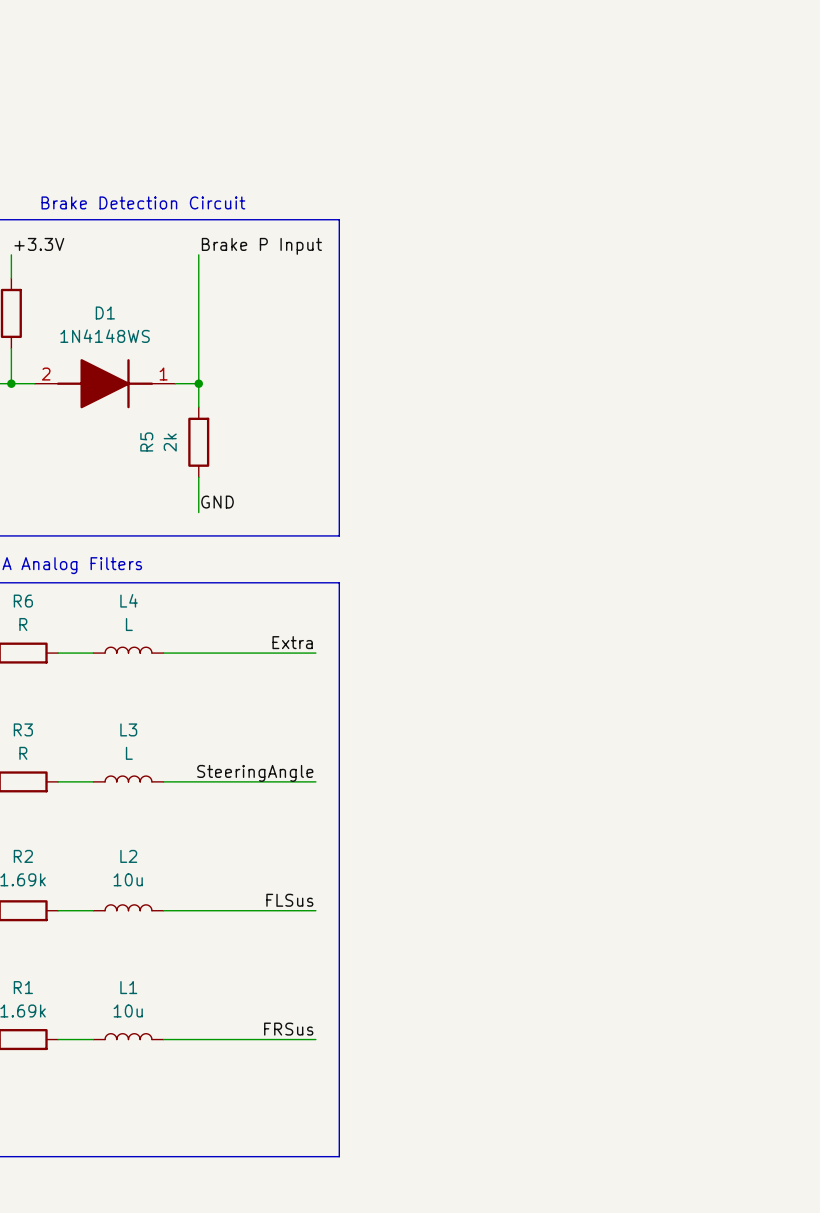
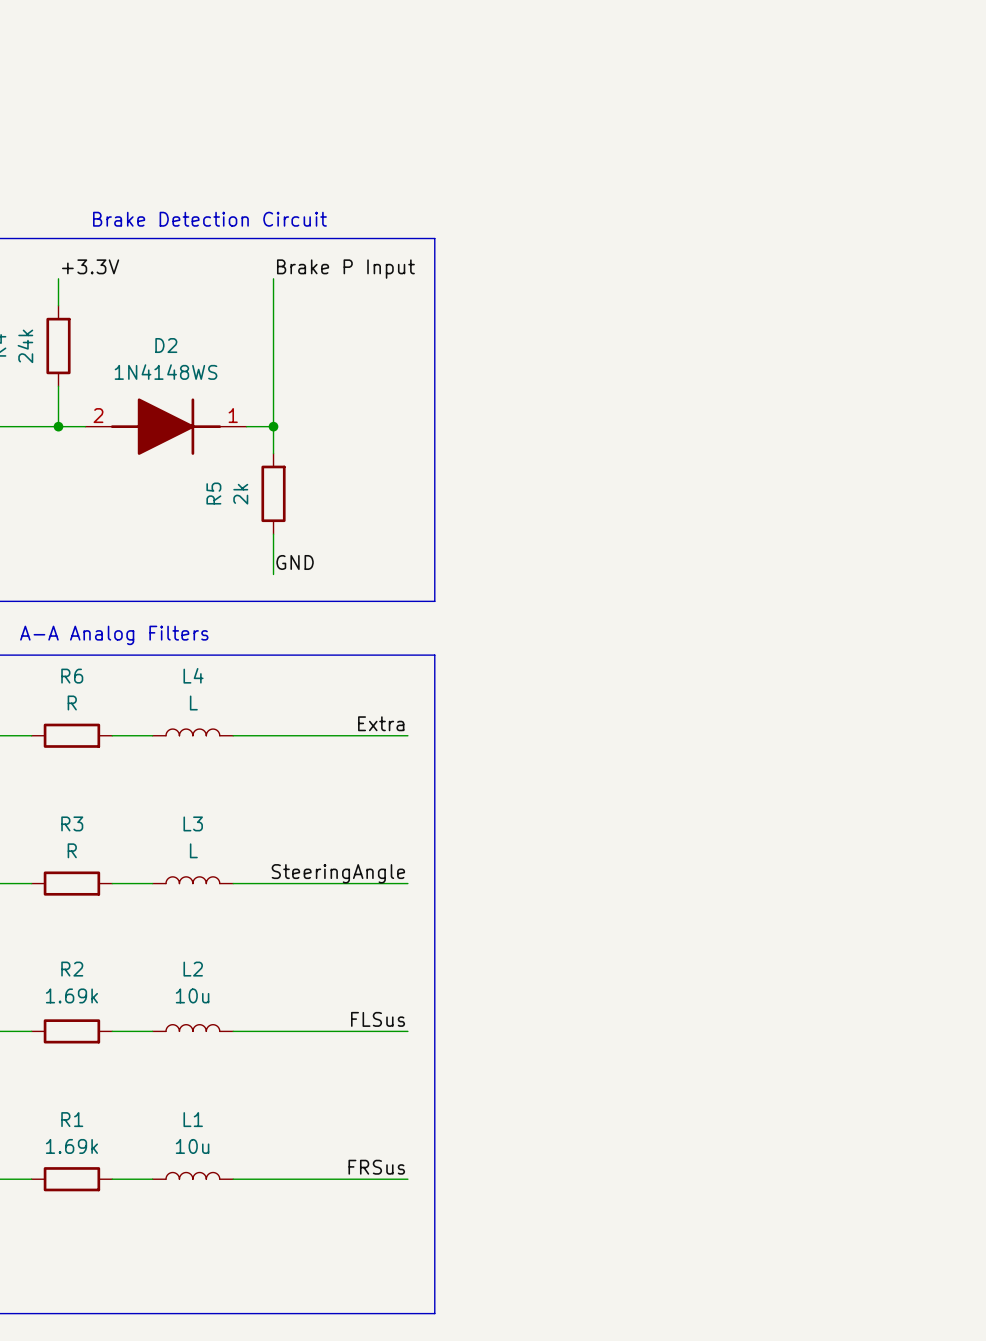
D1 name: D1 (105, 312) -> D2 (166, 345)

